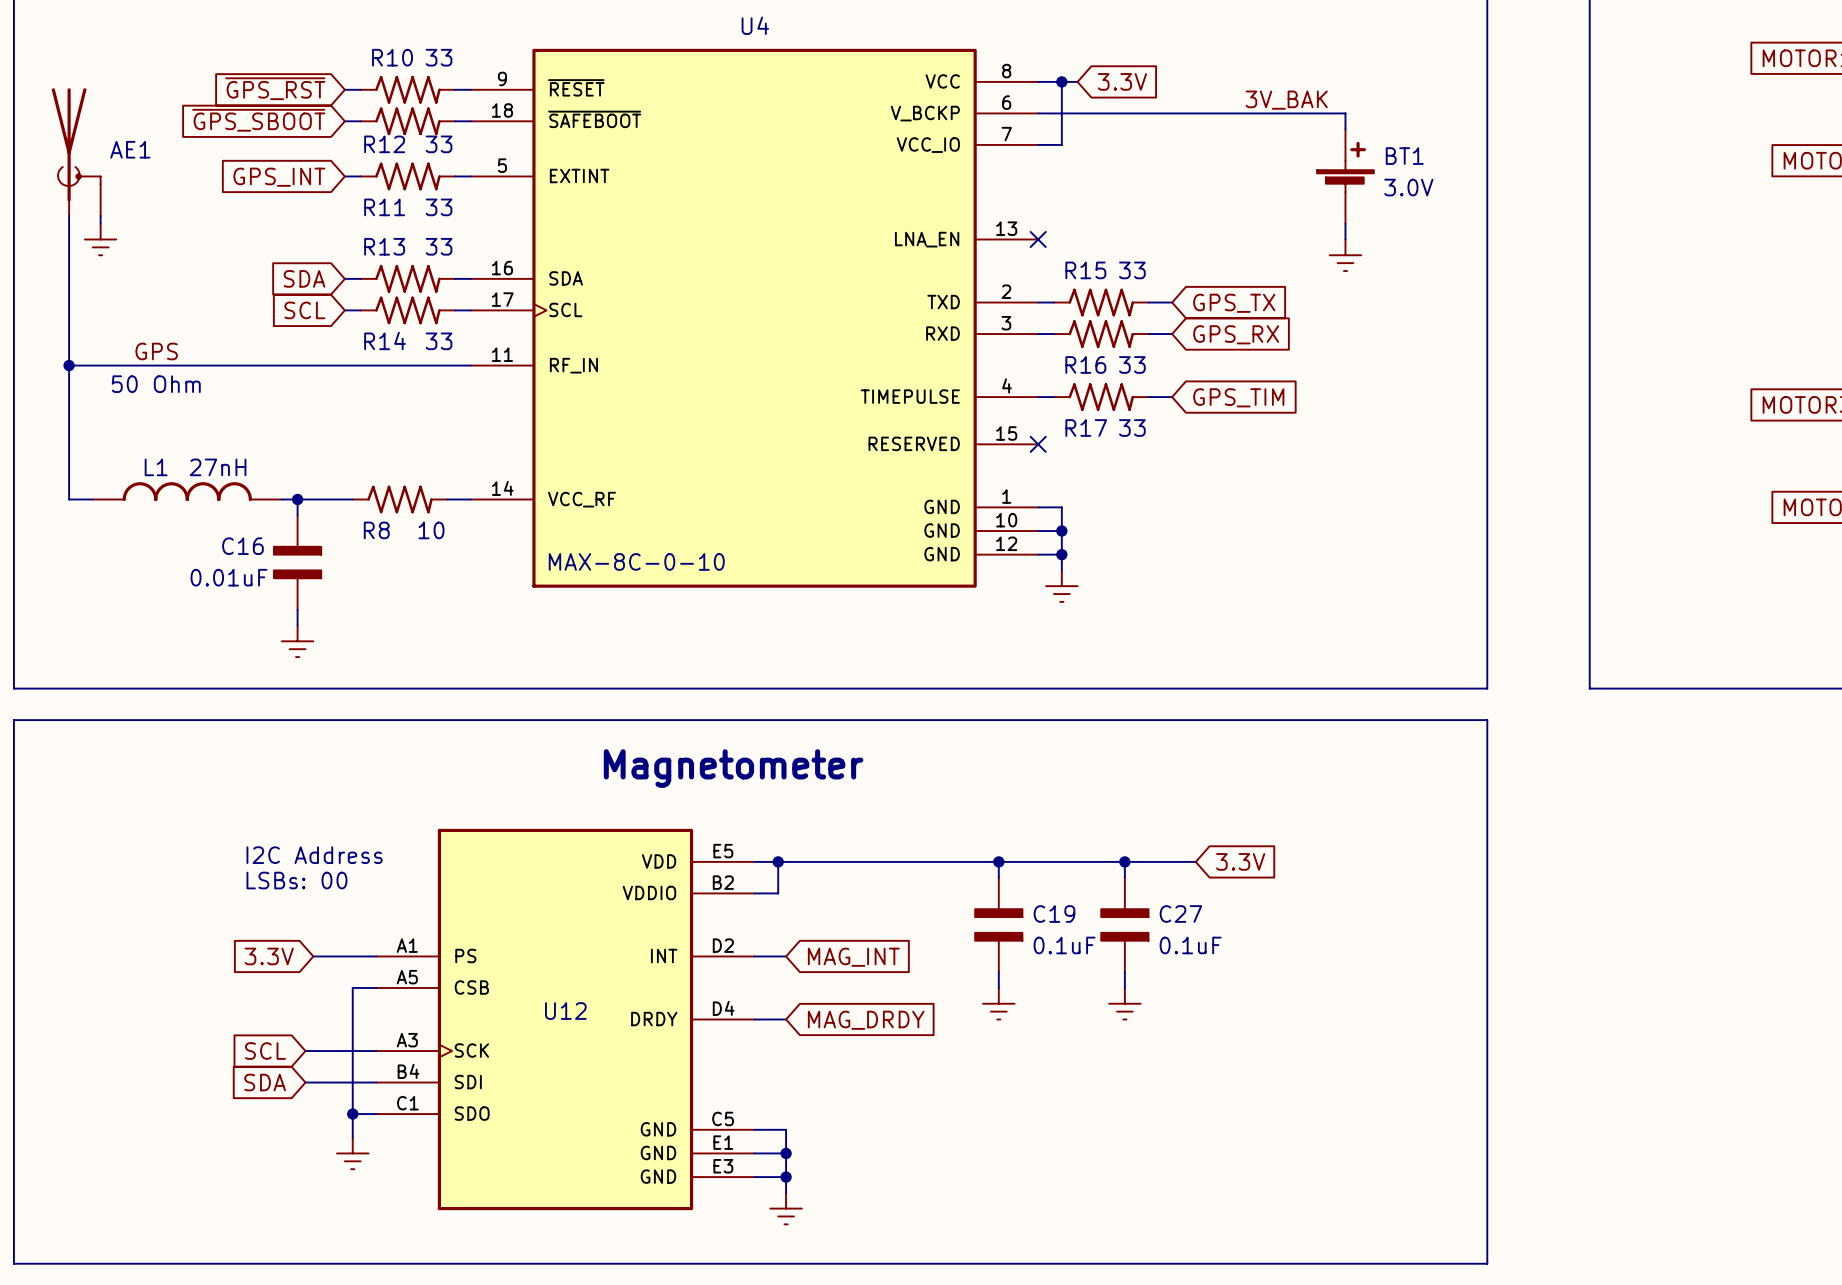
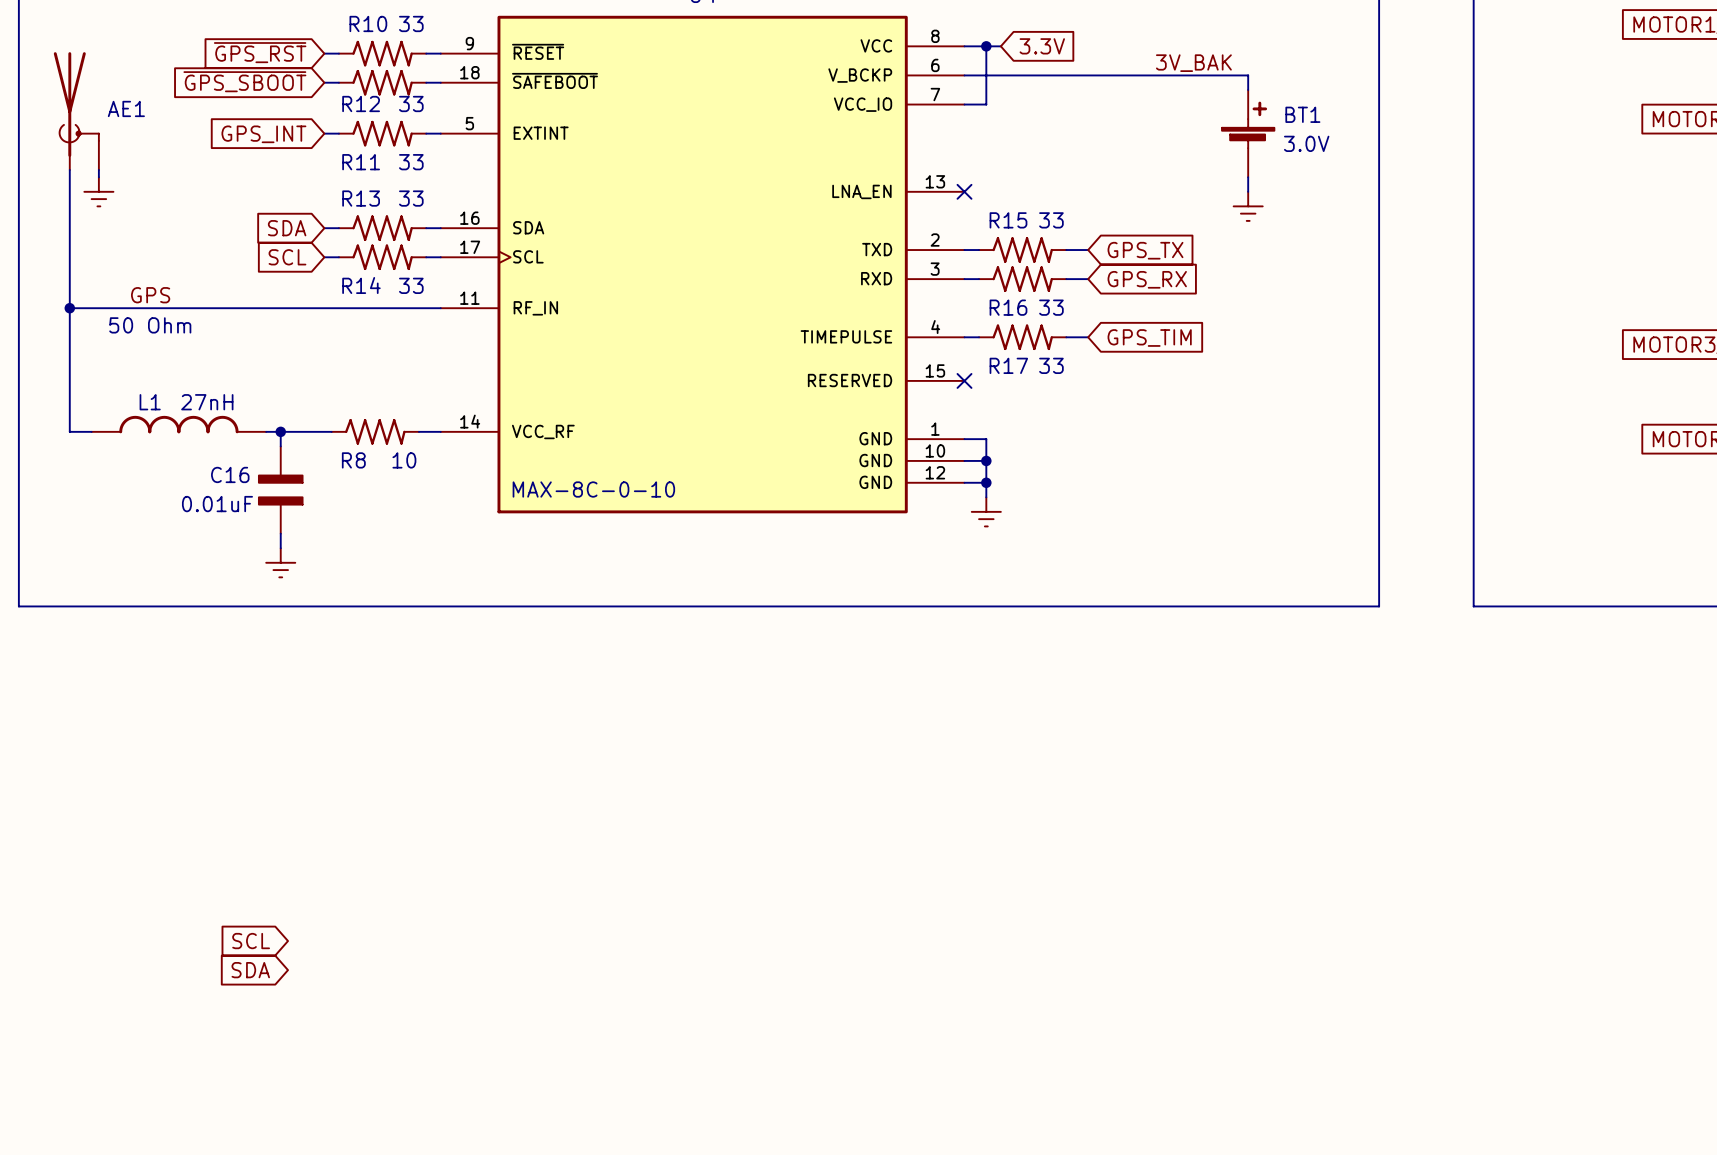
line: (13, 720) (1487, 720) (1487, 1263) (13, 1263) (13, 720) -> none
text: Magnetometer (733, 768) -> none
text: I2C Address (314, 855) -> none
wire: (754, 861) (1195, 861) -> none
wire: (778, 861) (778, 893) (754, 893) -> none
junction: (778, 861) -> none
wire: (998, 861) (998, 877) -> none
junction: (998, 861) -> none
wire: (1124, 861) (1124, 877) -> none
junction: (1124, 861) -> none
global label: 3.3V (1240, 861) -> none
text: LSBs: 00 (296, 880) -> none
C19: 0.1uF (998, 924) -> none
C27: 0.1uF (1124, 924) -> none
global label: 3.3V (269, 956) -> none
wire: (313, 956) (376, 956) -> none
wire: (754, 956) (786, 956) -> none
global label: MAG_INT (853, 957) -> none
wire: (998, 972) (998, 987) -> none
wire: (1124, 972) (1124, 987) -> none
wire: (376, 987) (352, 987) (352, 1137) -> none
power symbol: (998, 1003) -> none
power symbol: (1124, 1003) -> none
U12: (565, 1019) -> none
wire: (754, 1019) (786, 1019) -> none
global label: MAG_DRDY (866, 1020) -> none
wire: (305, 1051) (376, 1051) -> none
wire: (305, 1082) (376, 1082) -> none
wire: (352, 1114) (376, 1114) -> none
junction: (352, 1114) -> none
wire: (754, 1129) (786, 1129) (786, 1192) -> none
power symbol: (352, 1153) -> none
wire: (754, 1153) (786, 1153) -> none
junction: (786, 1153) -> none
wire: (754, 1177) (786, 1177) -> none
junction: (786, 1177) -> none
power symbol: (786, 1208) -> none

